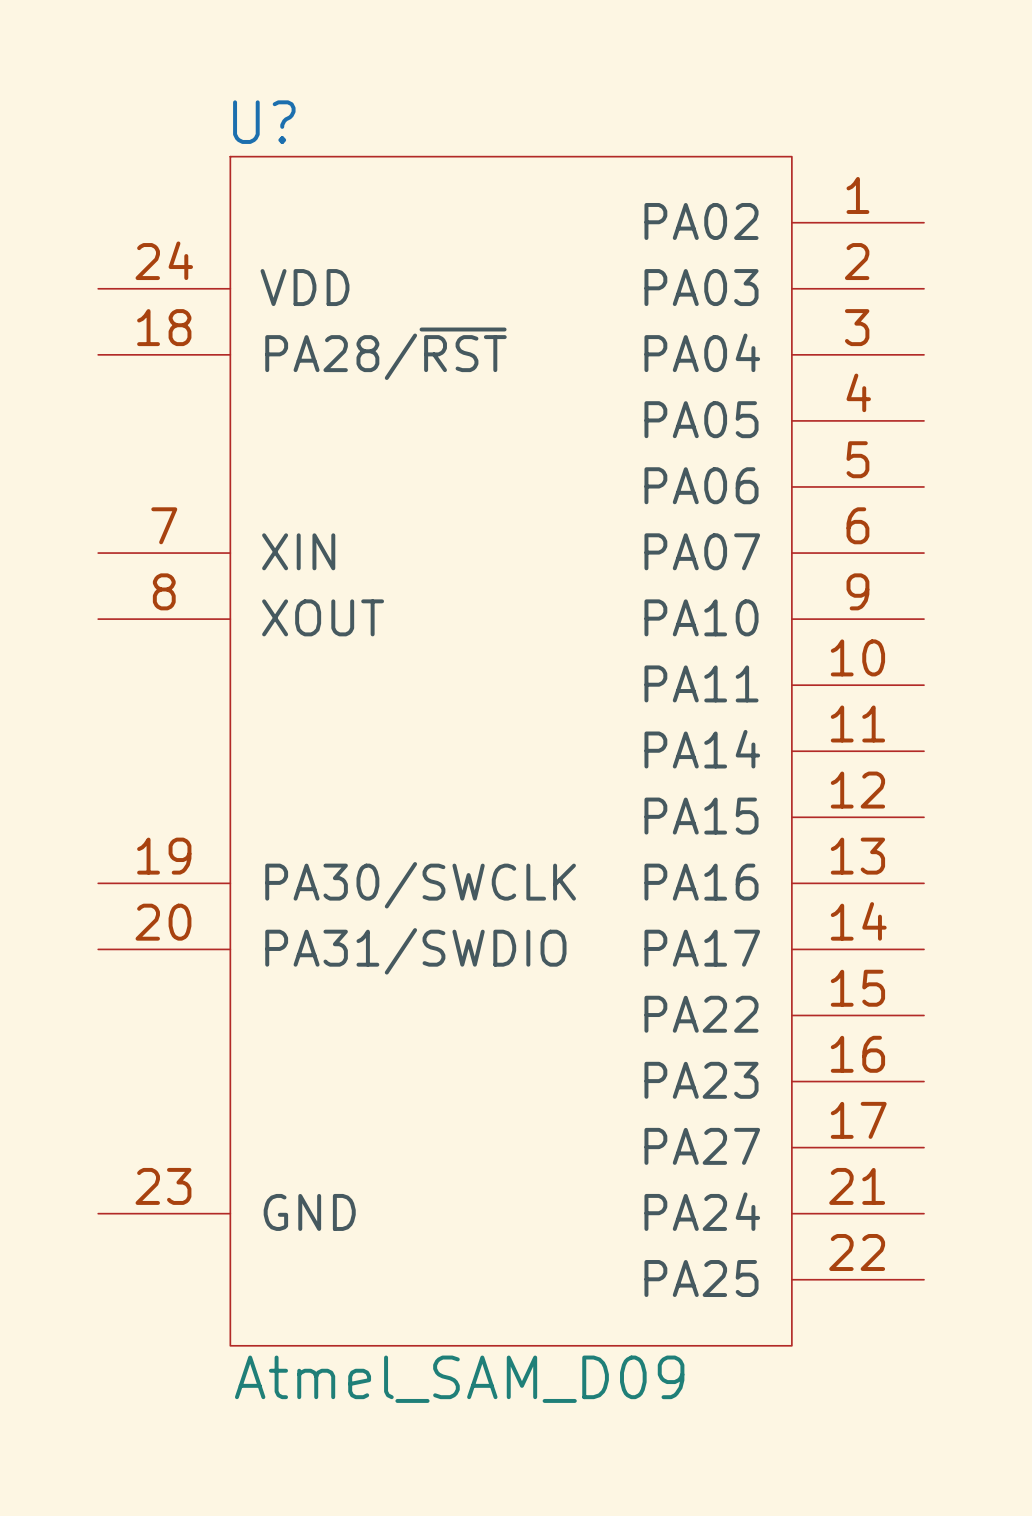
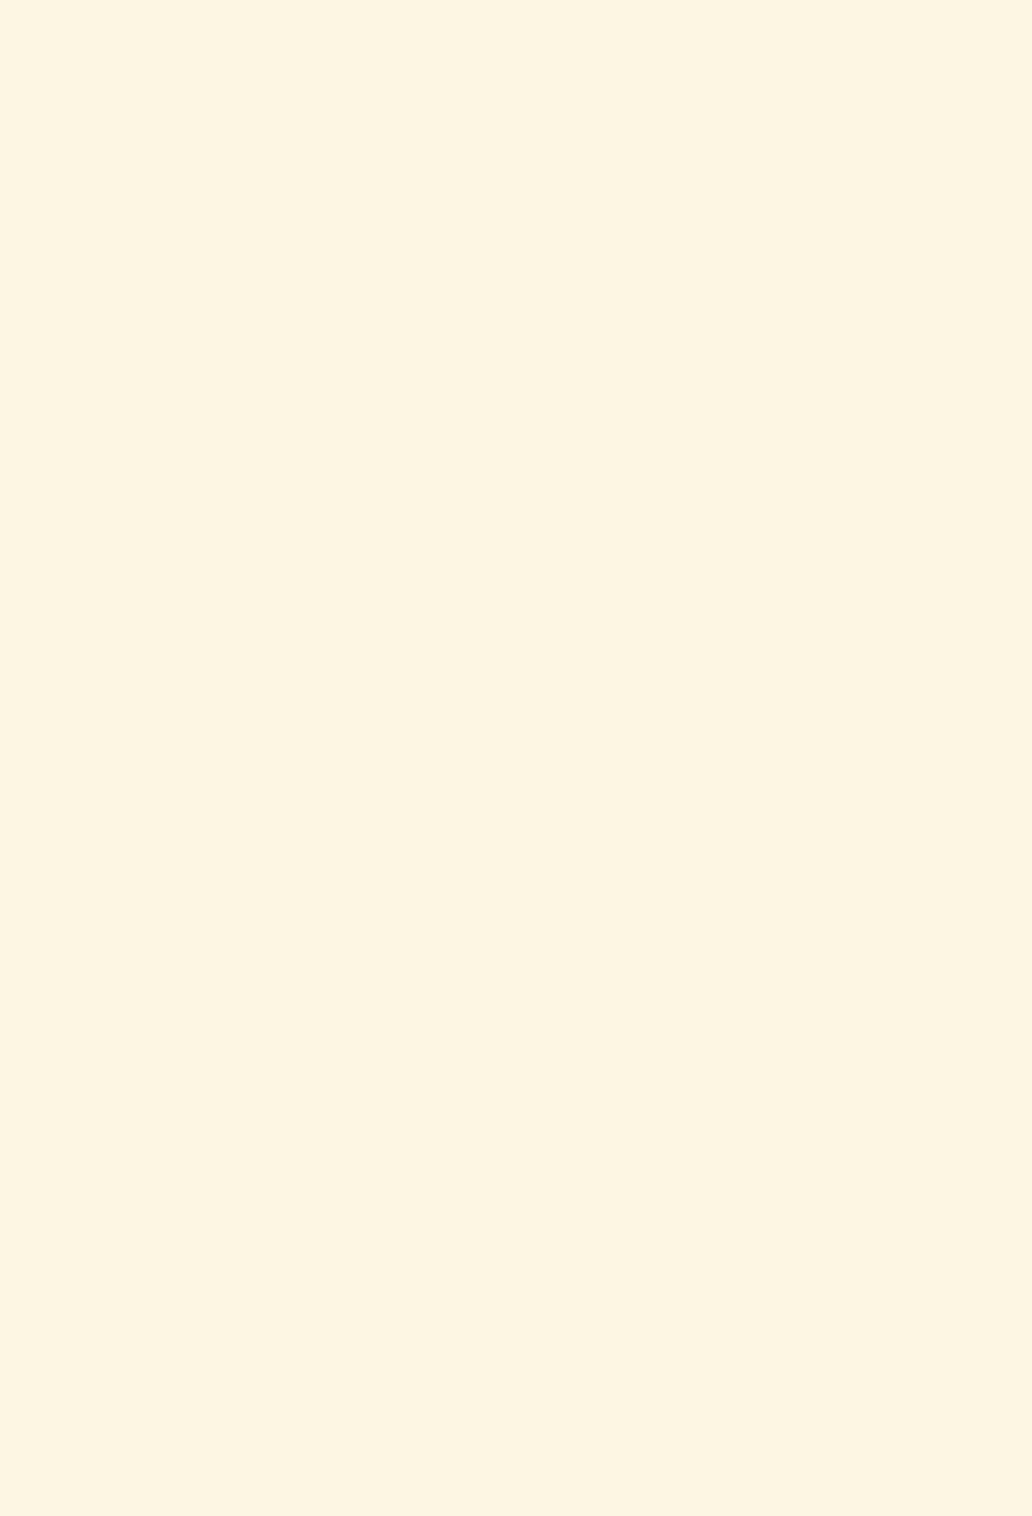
U?: Atmel_SAM_D09 (511, 751) -> none

